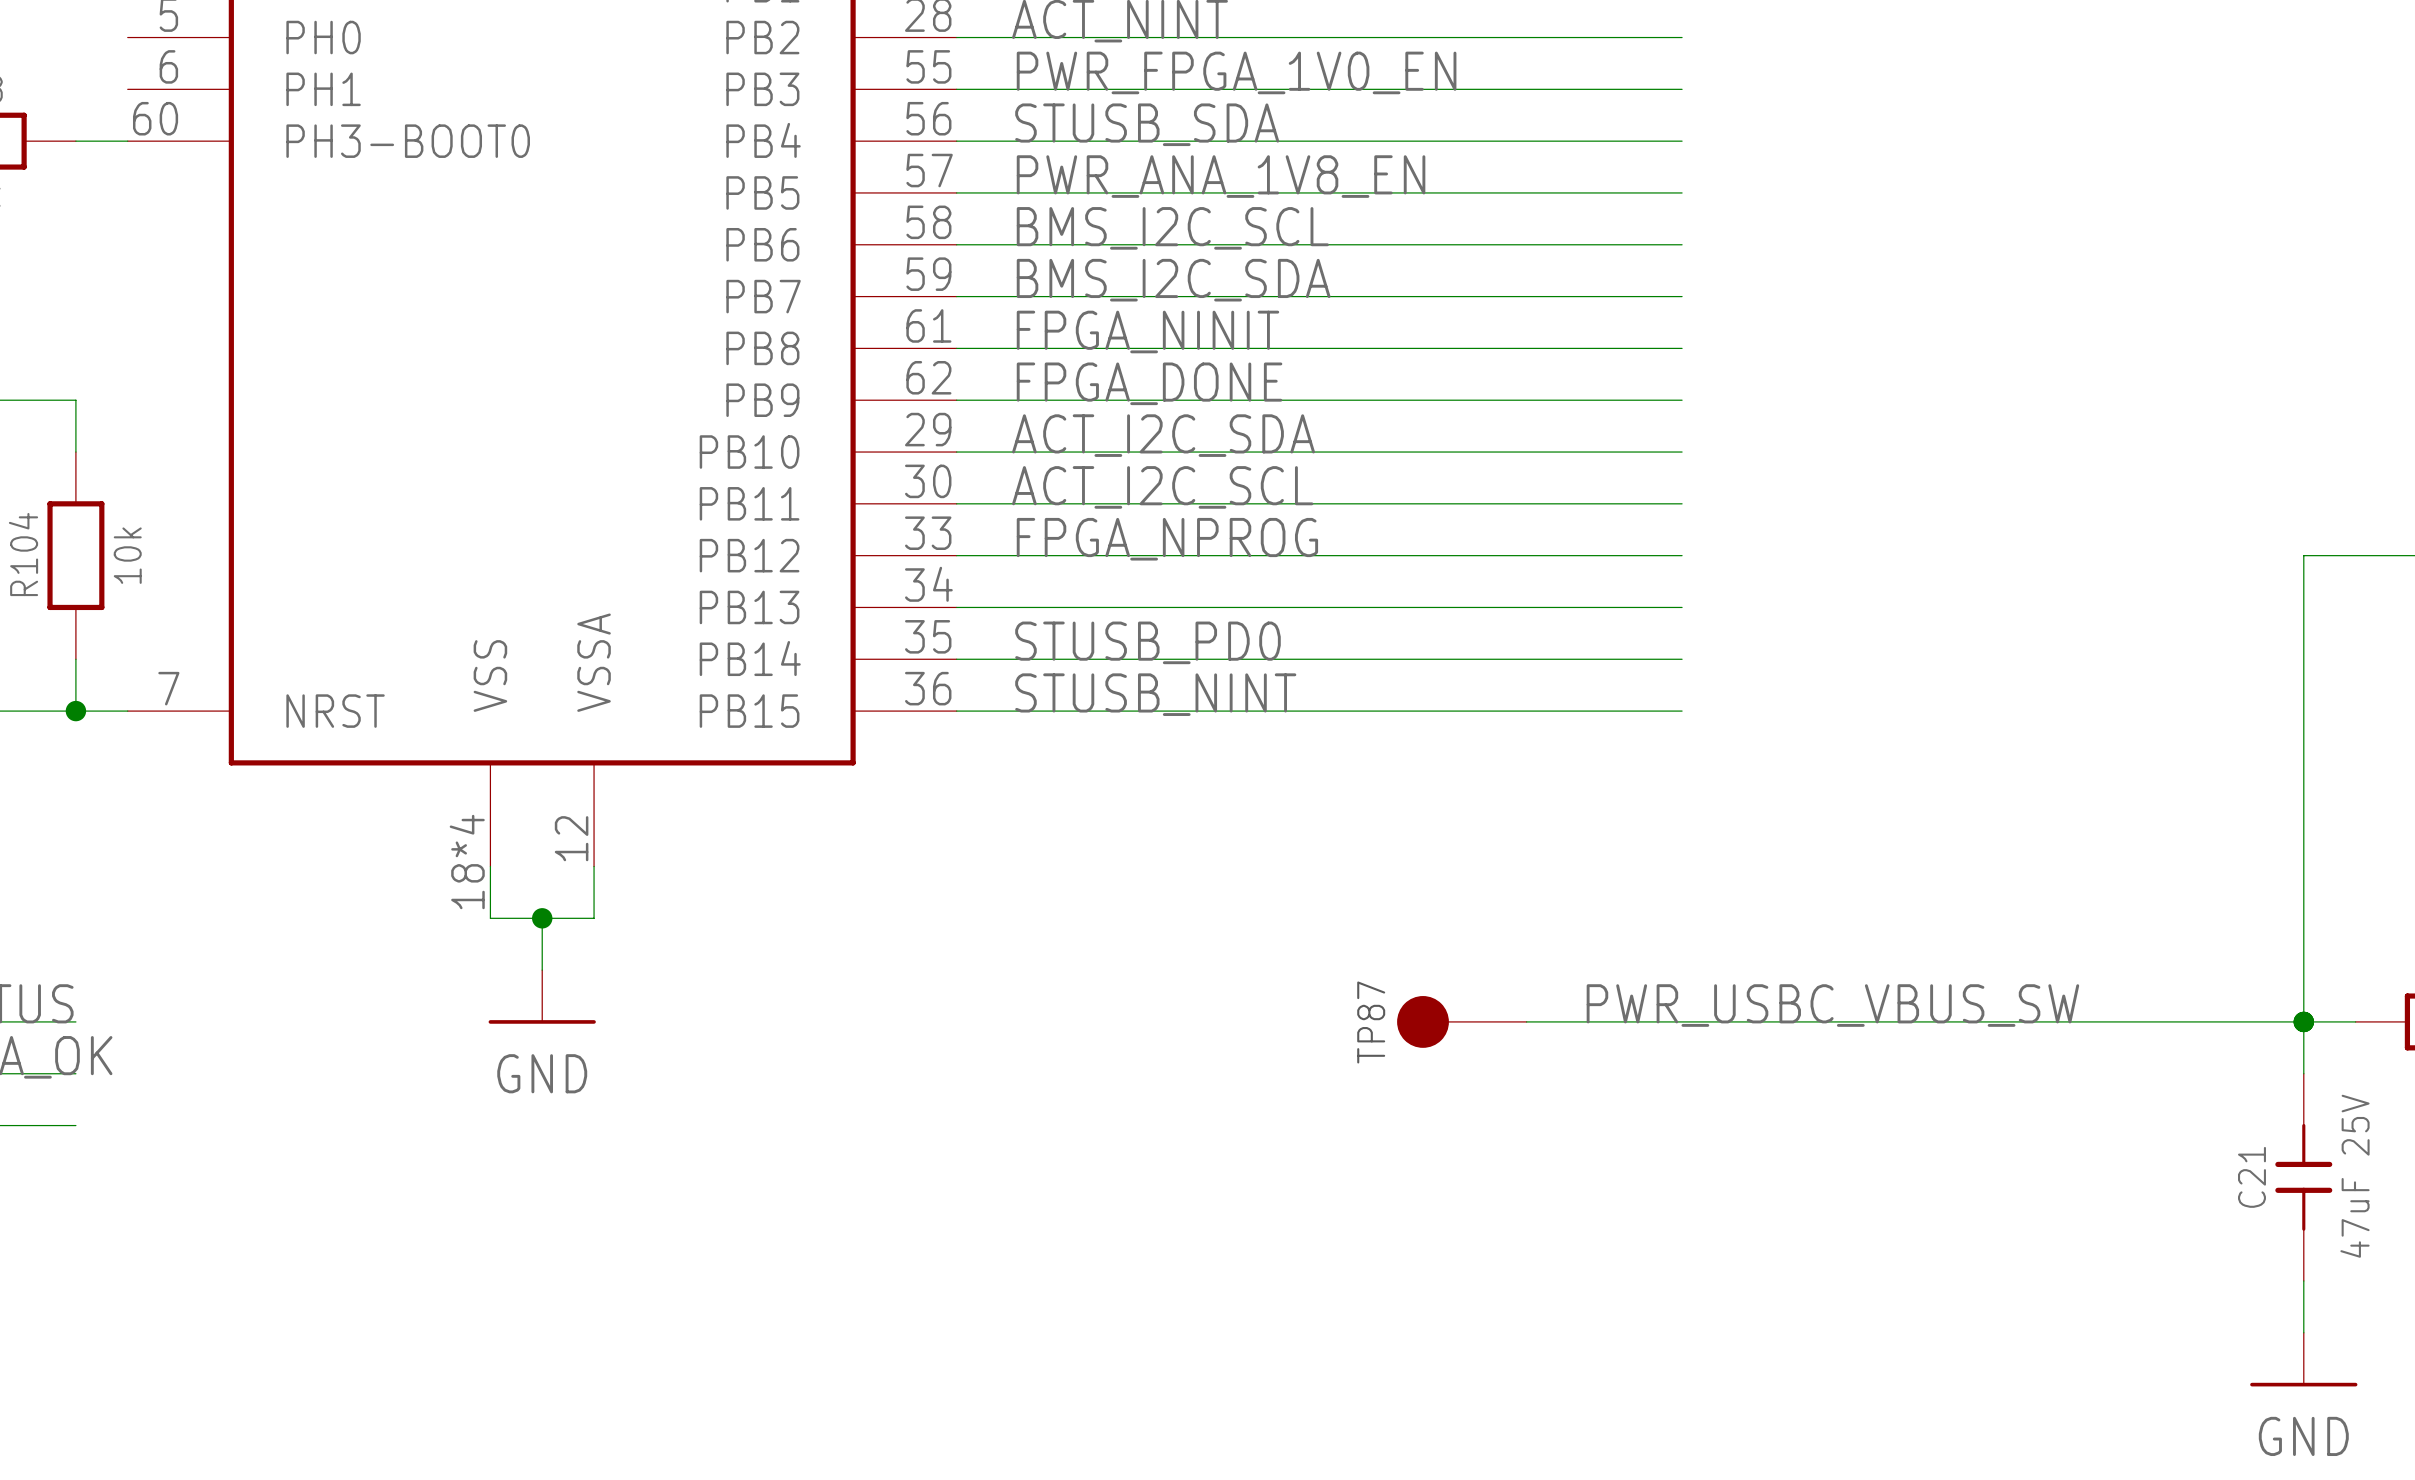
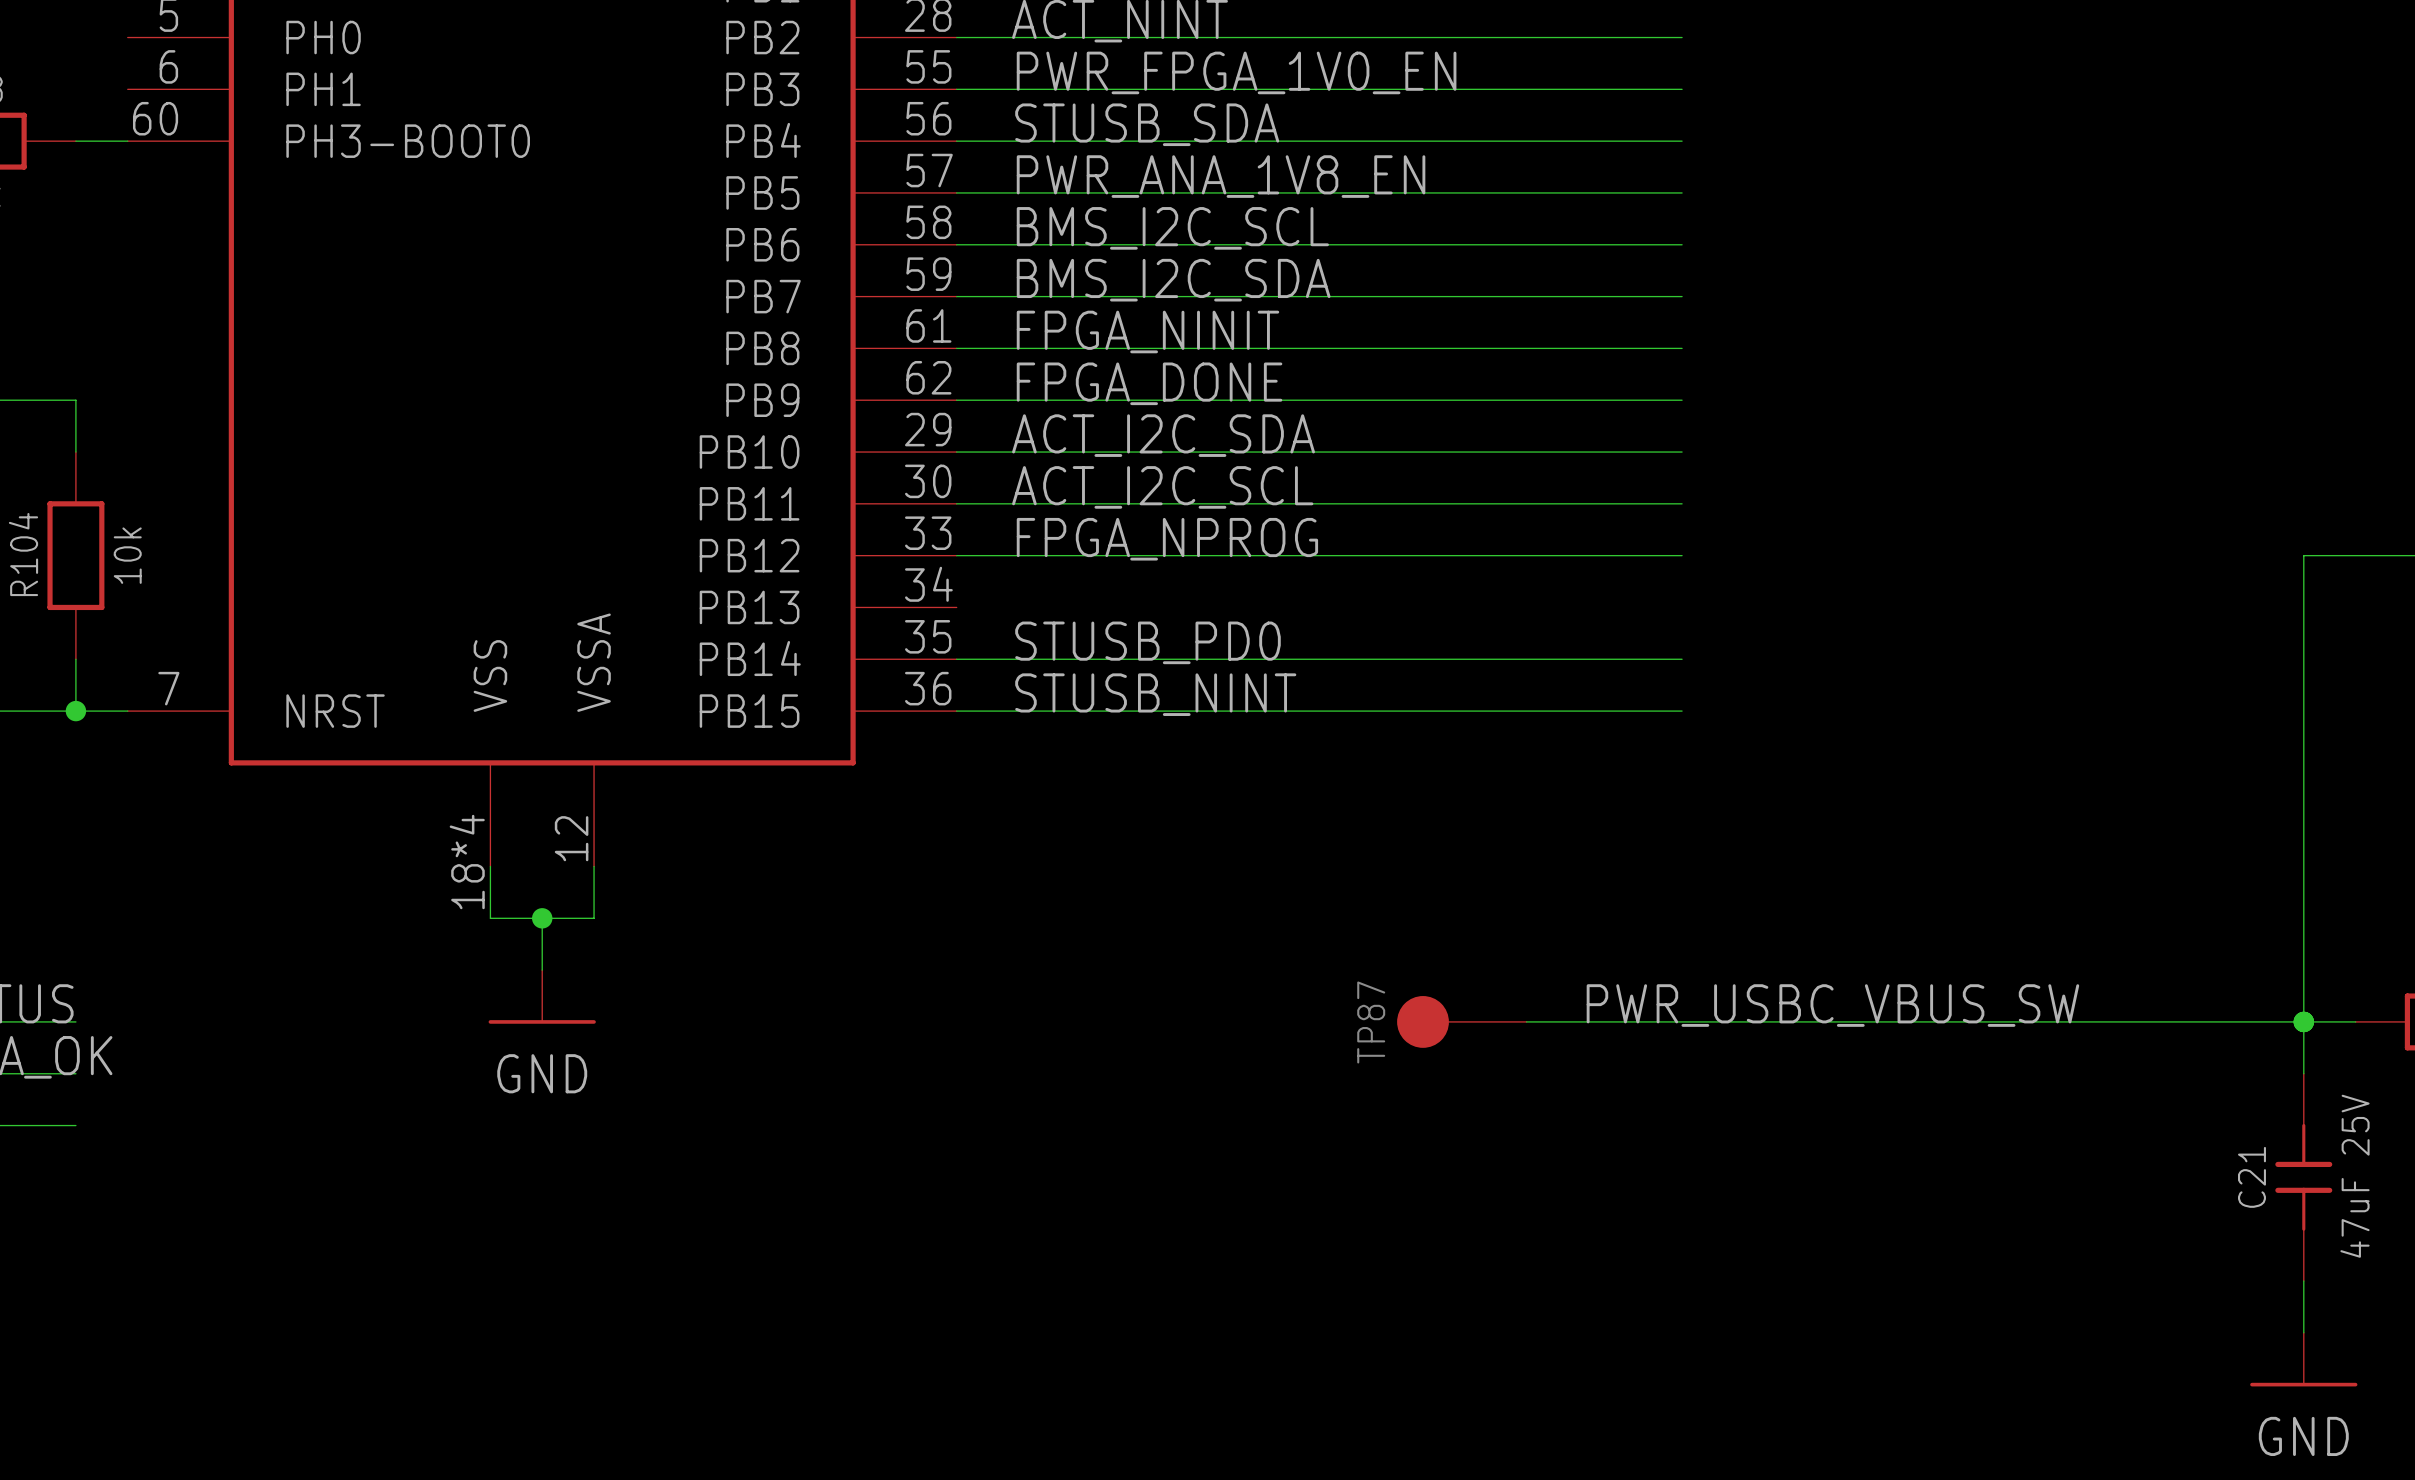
wire: (956, 607) (1682, 607) -> none

